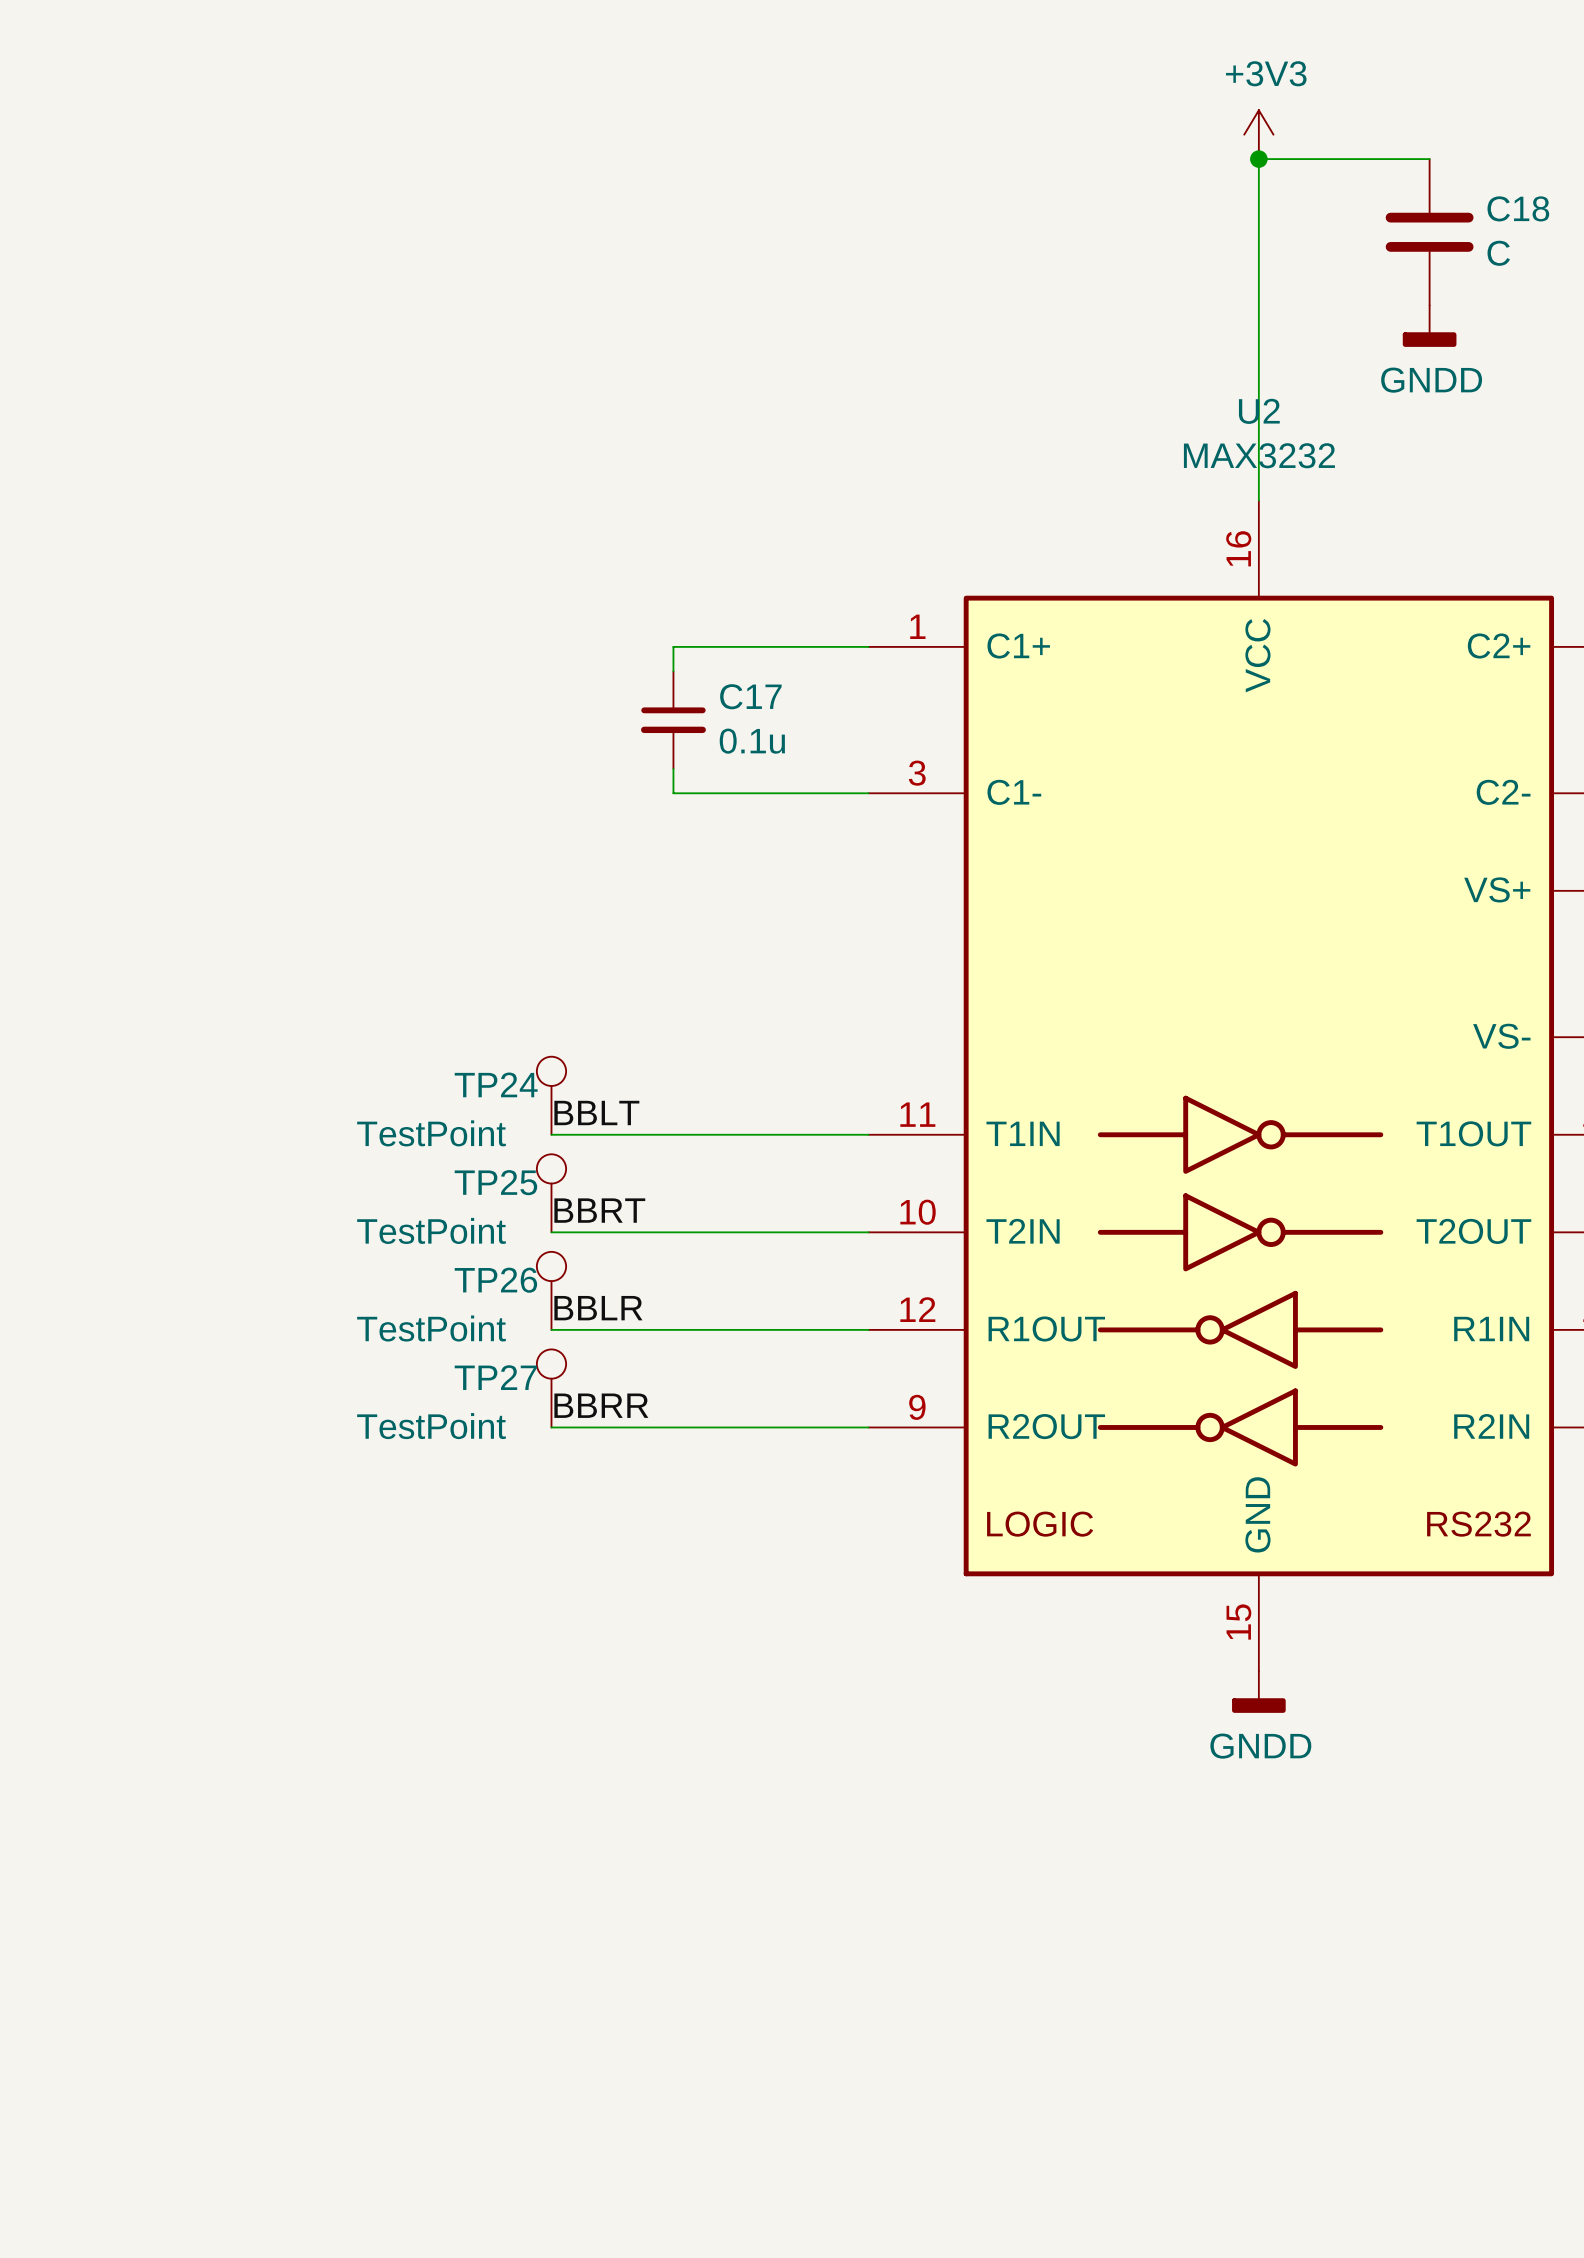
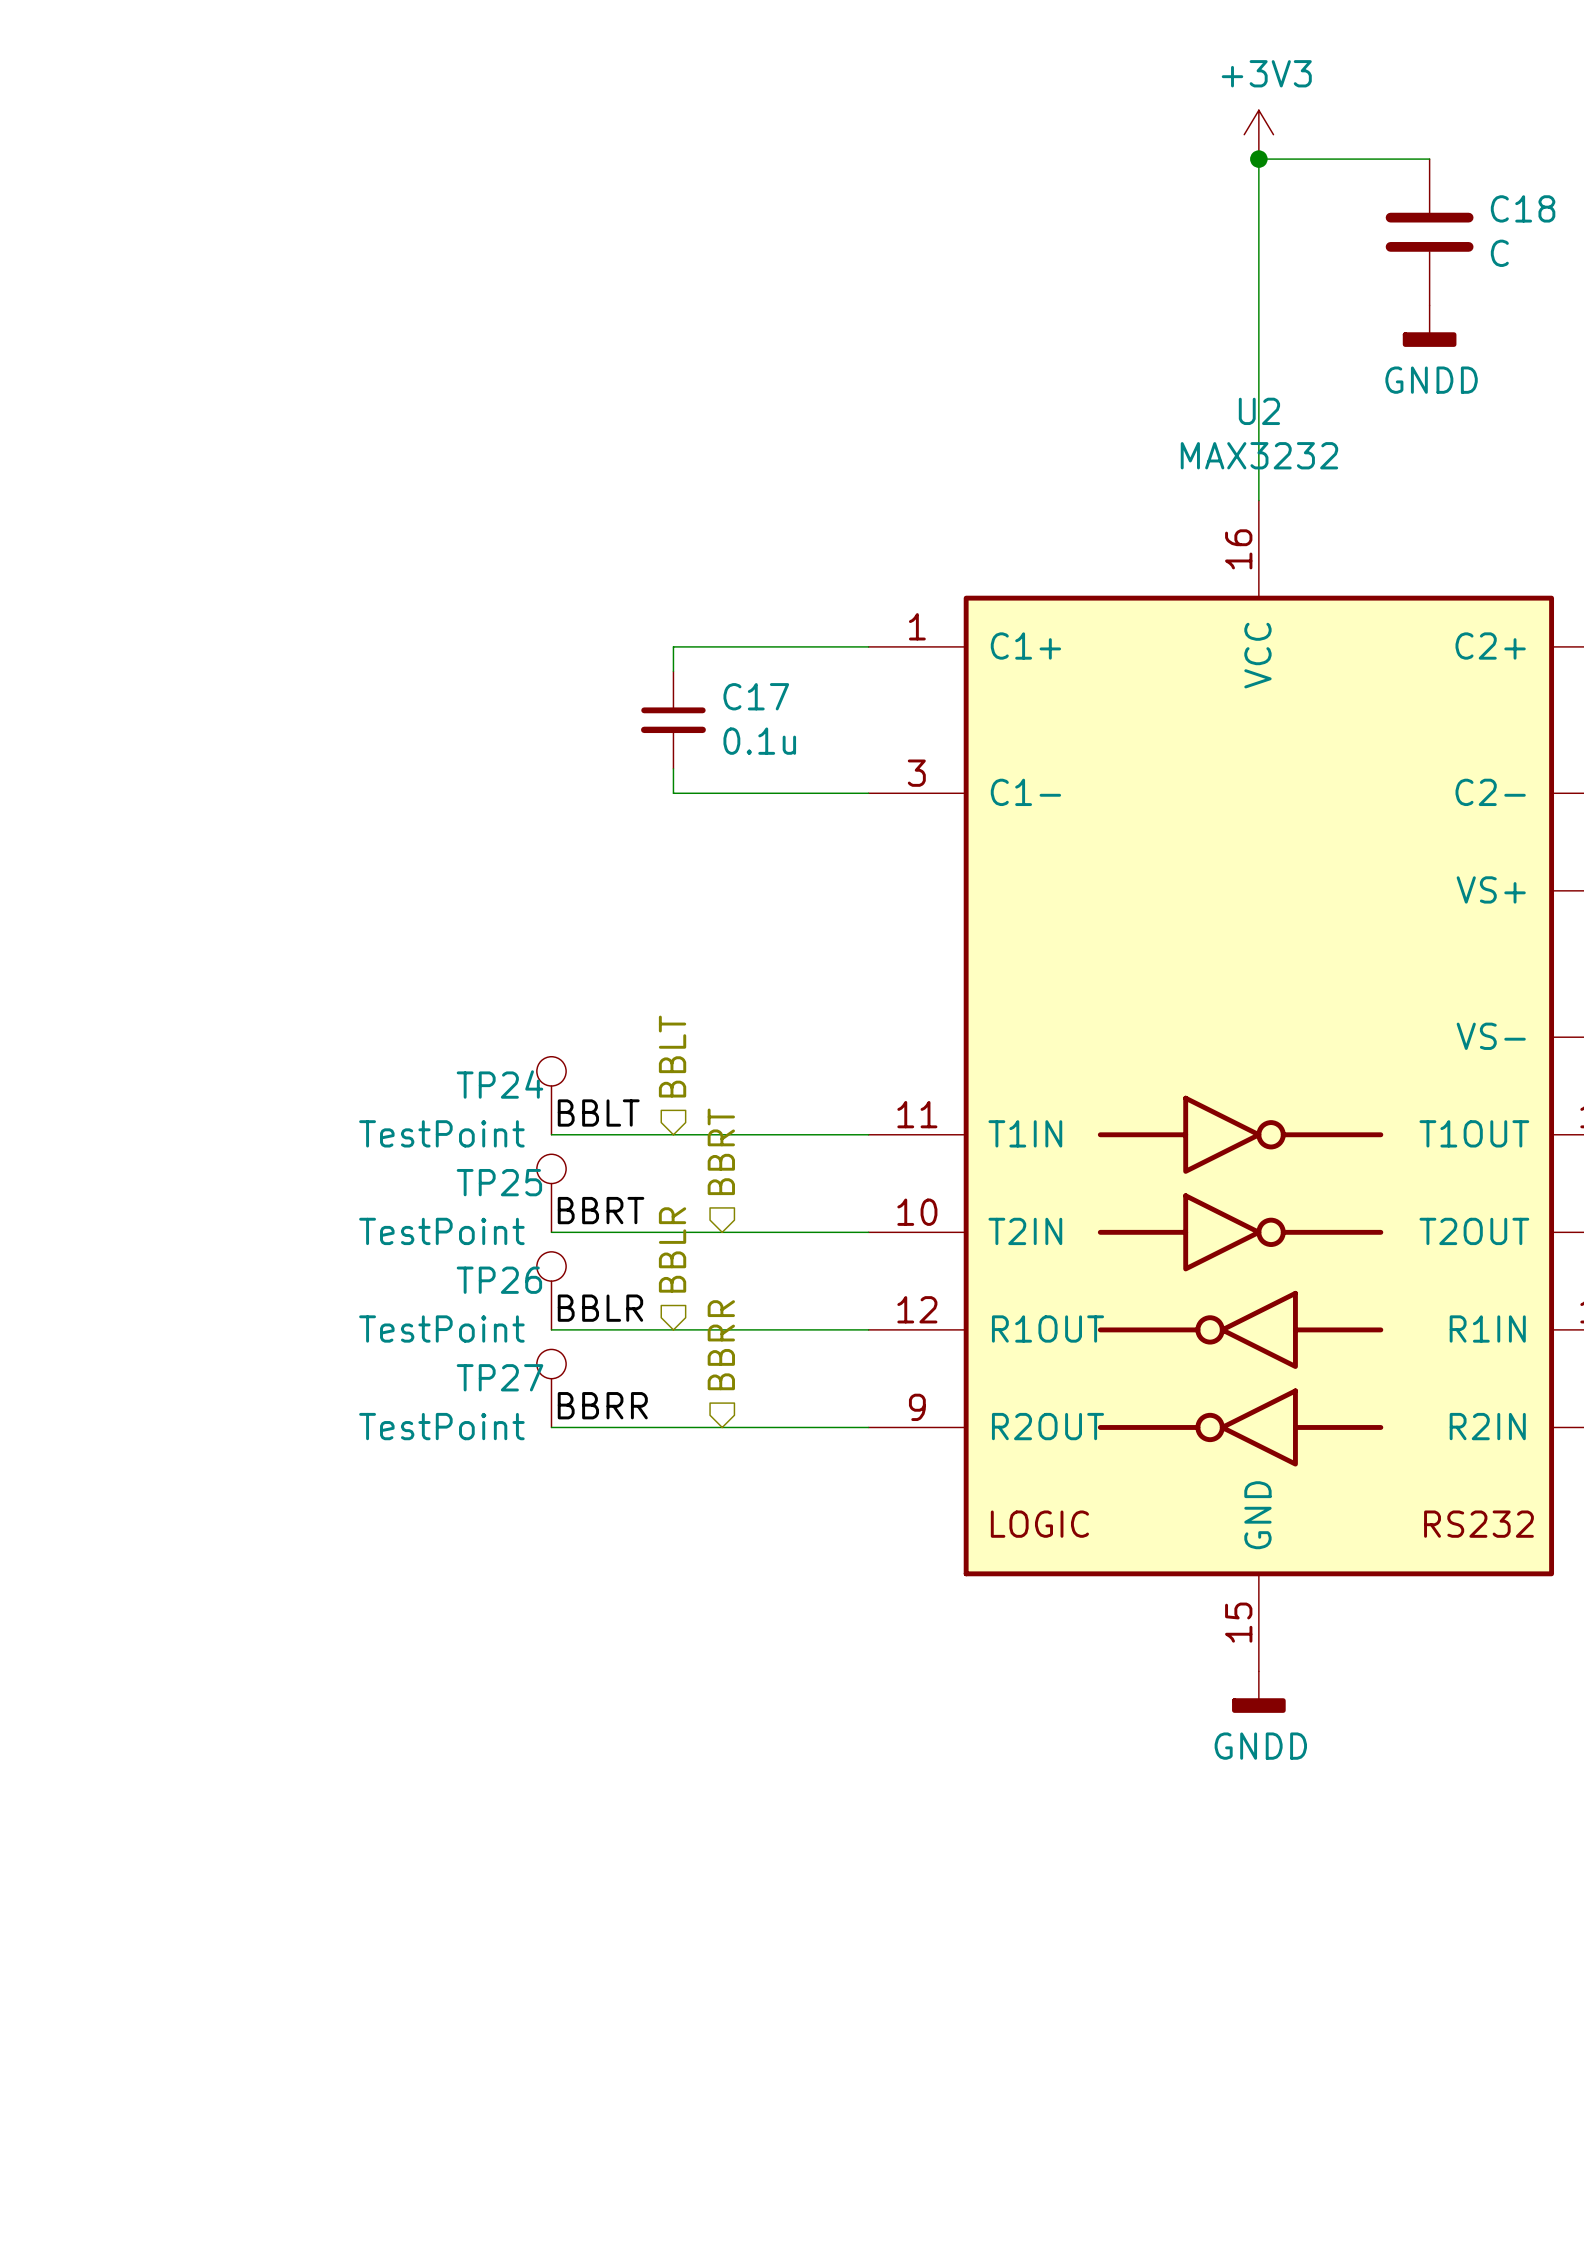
hierarchical label: none -> BBLT (672, 1056)
hierarchical label: none -> BBRT (721, 1151)
hierarchical label: none -> BBLR (672, 1249)
hierarchical label: none -> BBRR (721, 1345)

